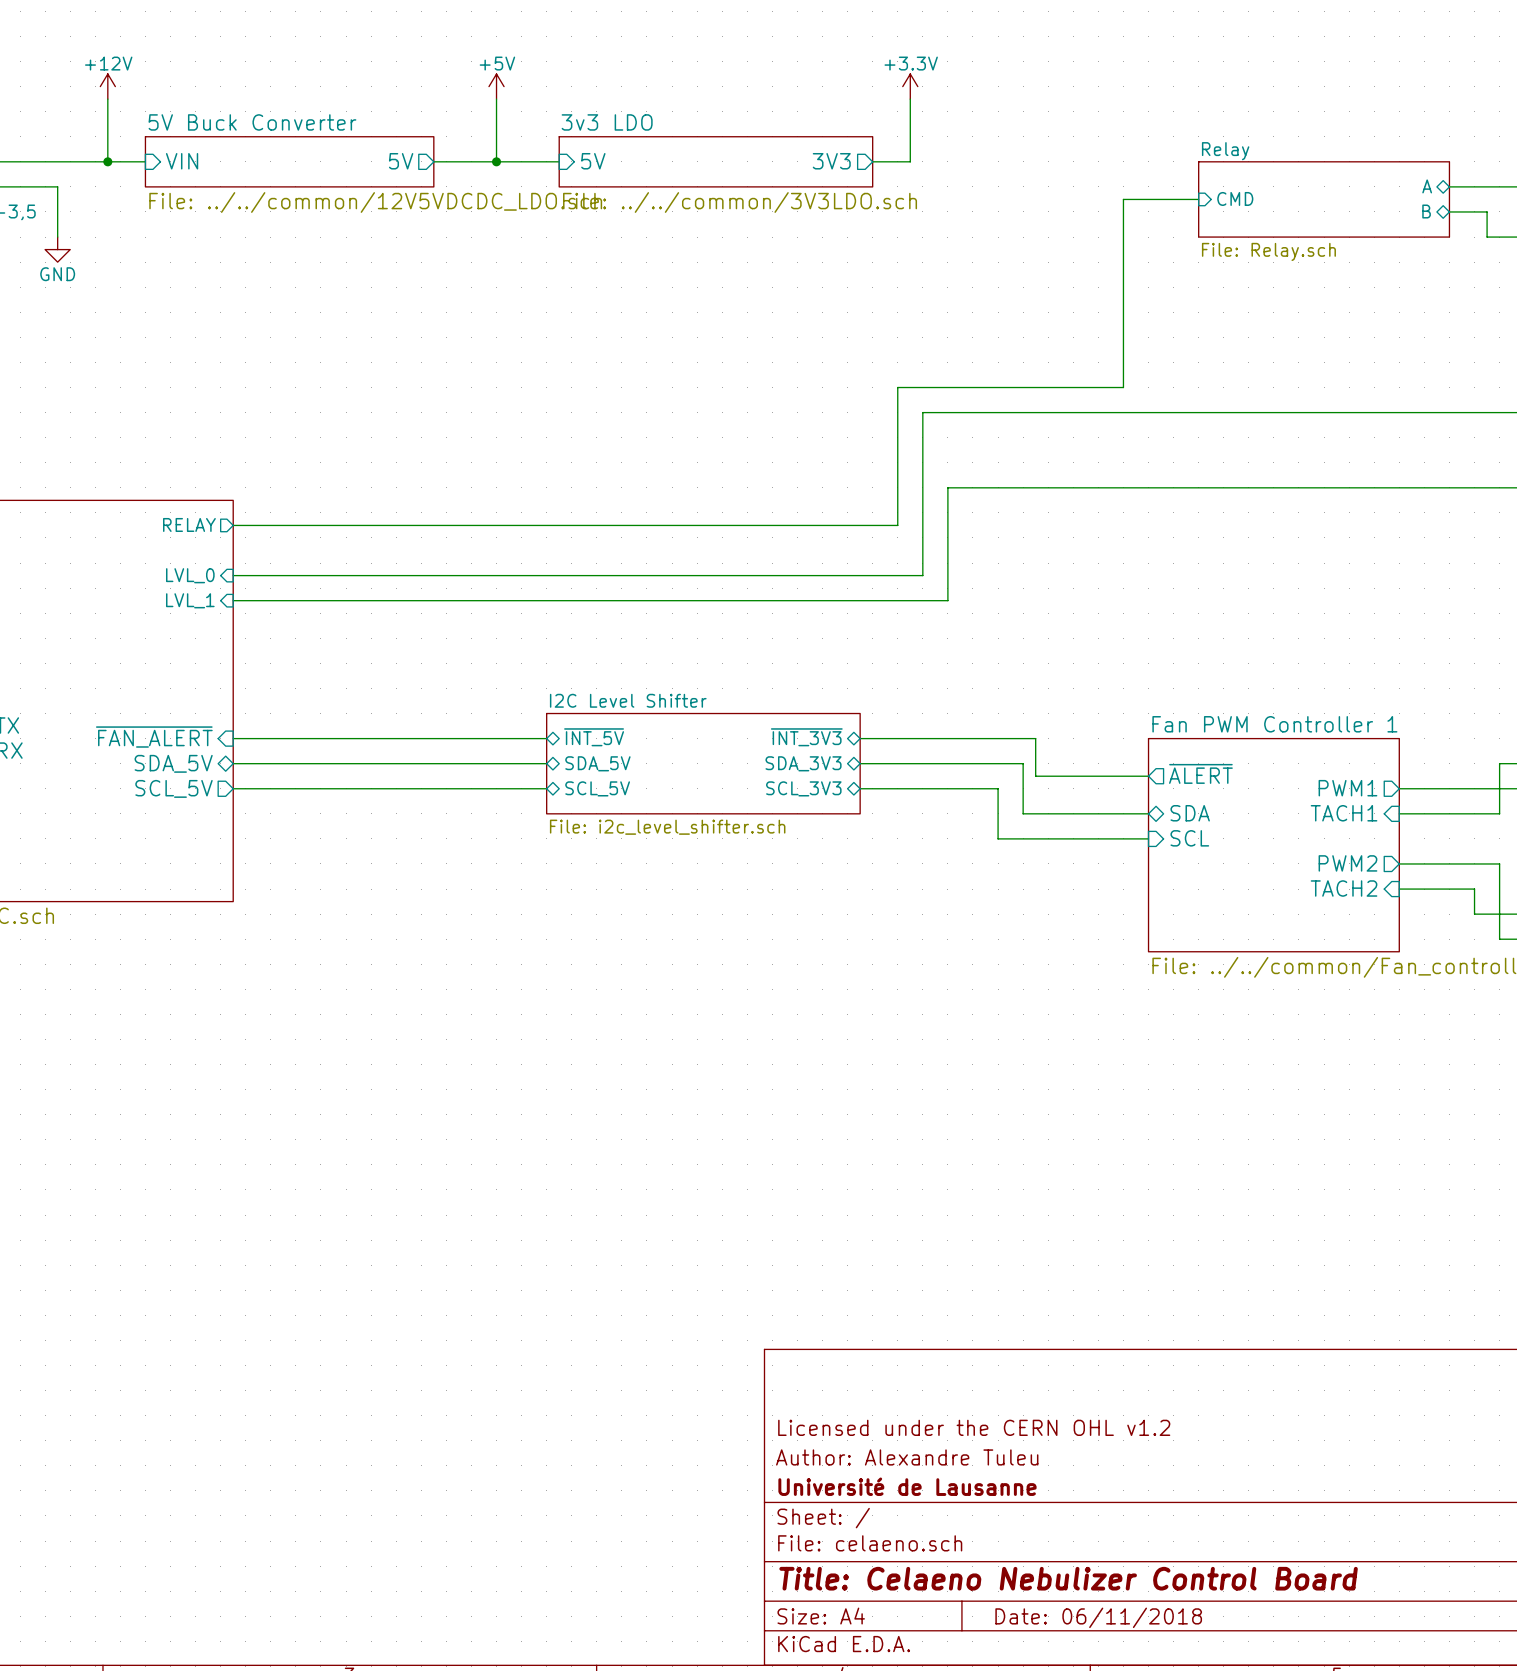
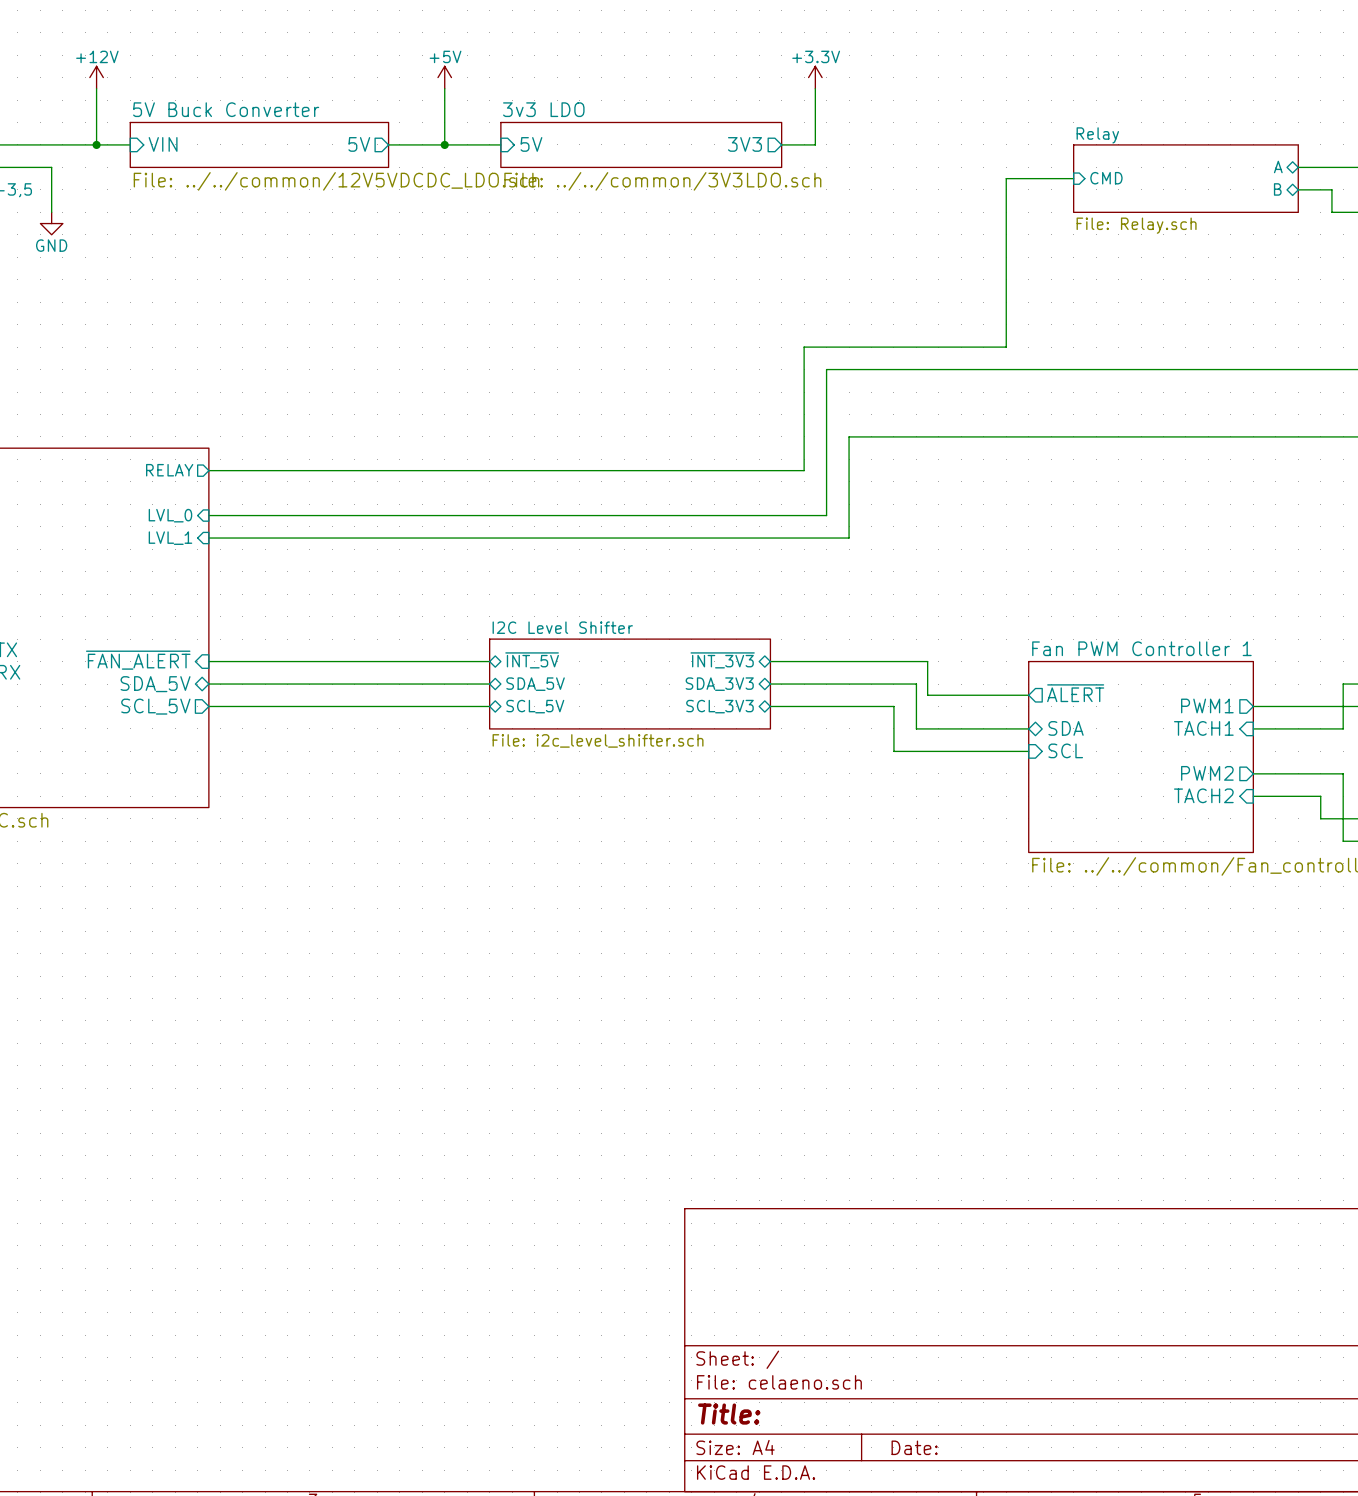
title block: Licensed under the CERN OHL v1.2 (974, 1427) -> none
title block: Author: Alexandre Tuleu (907, 1457) -> none
title block: Université de Lausanne (907, 1486) -> none
title block: Title: Celaeno Nebulizer Control Board (1068, 1578) -> Title: (729, 1414)
title block: Date: 06/11/2018 (1098, 1617) -> Date: (914, 1447)

